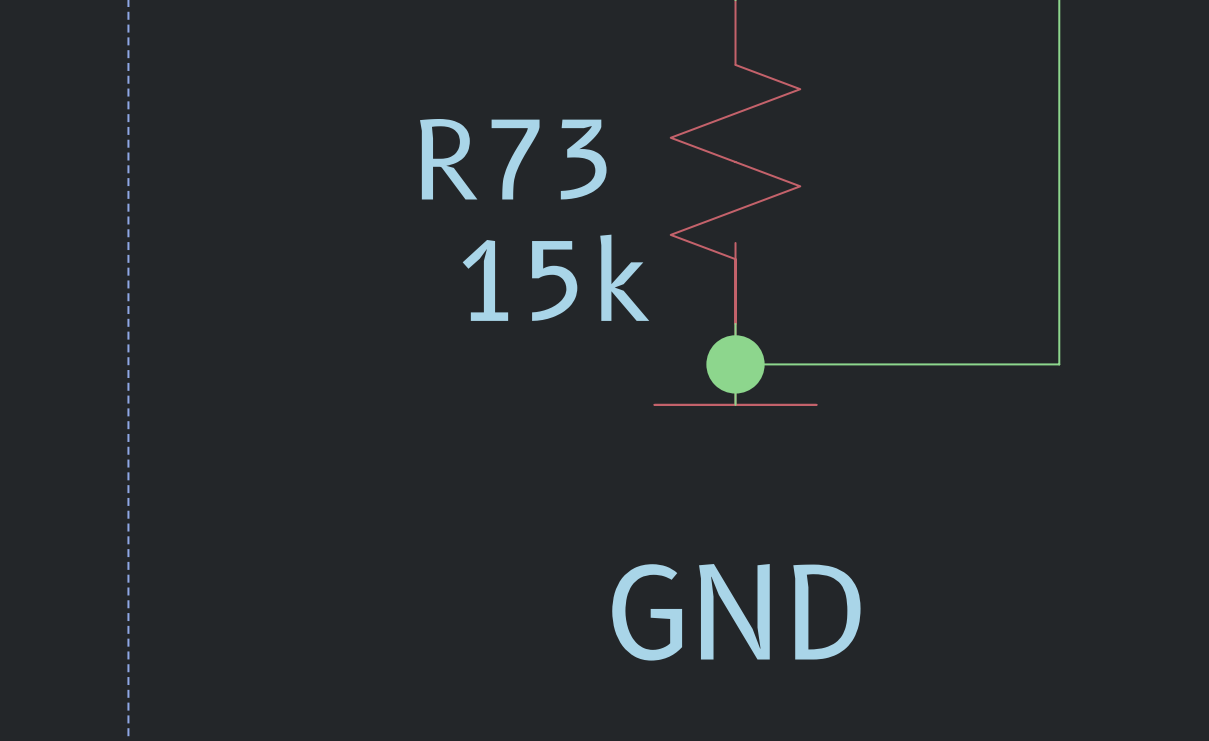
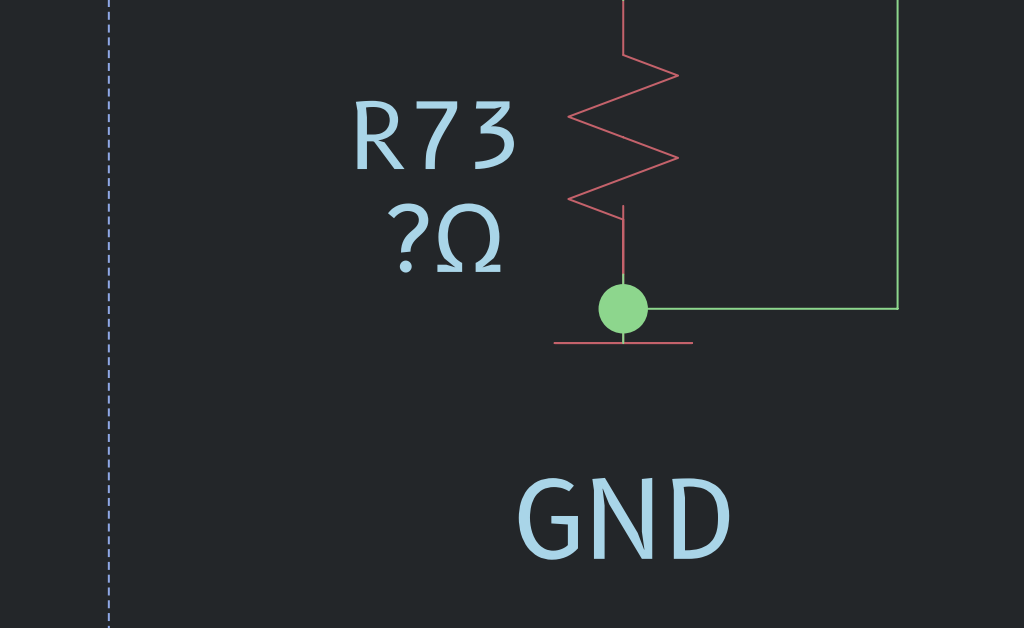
R73 text: 15k (555, 277) -> ?Ω (444, 238)

